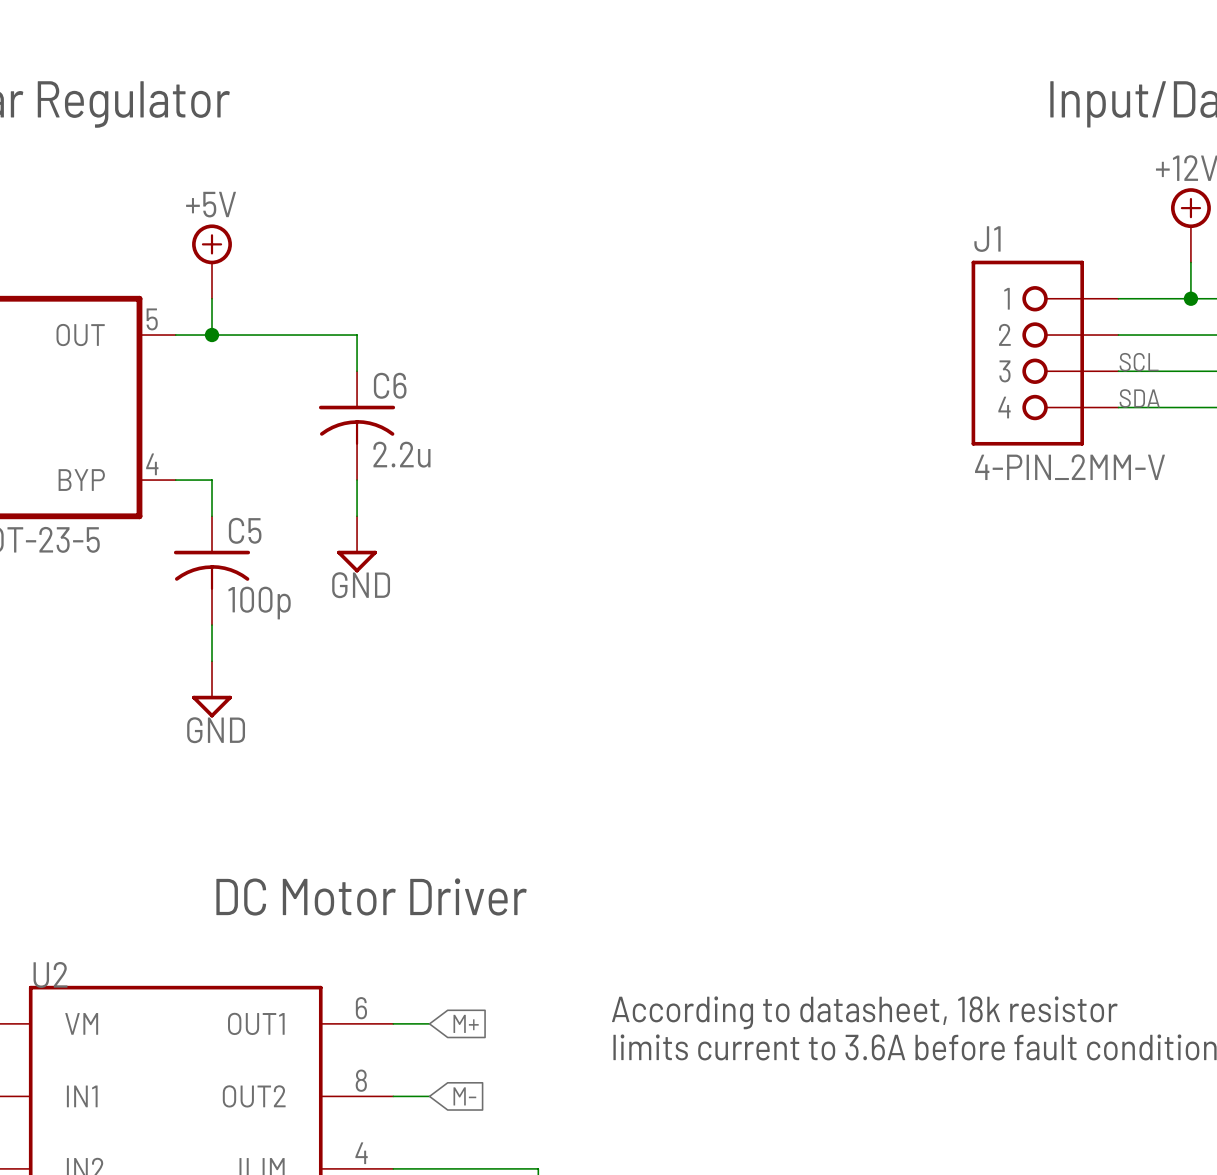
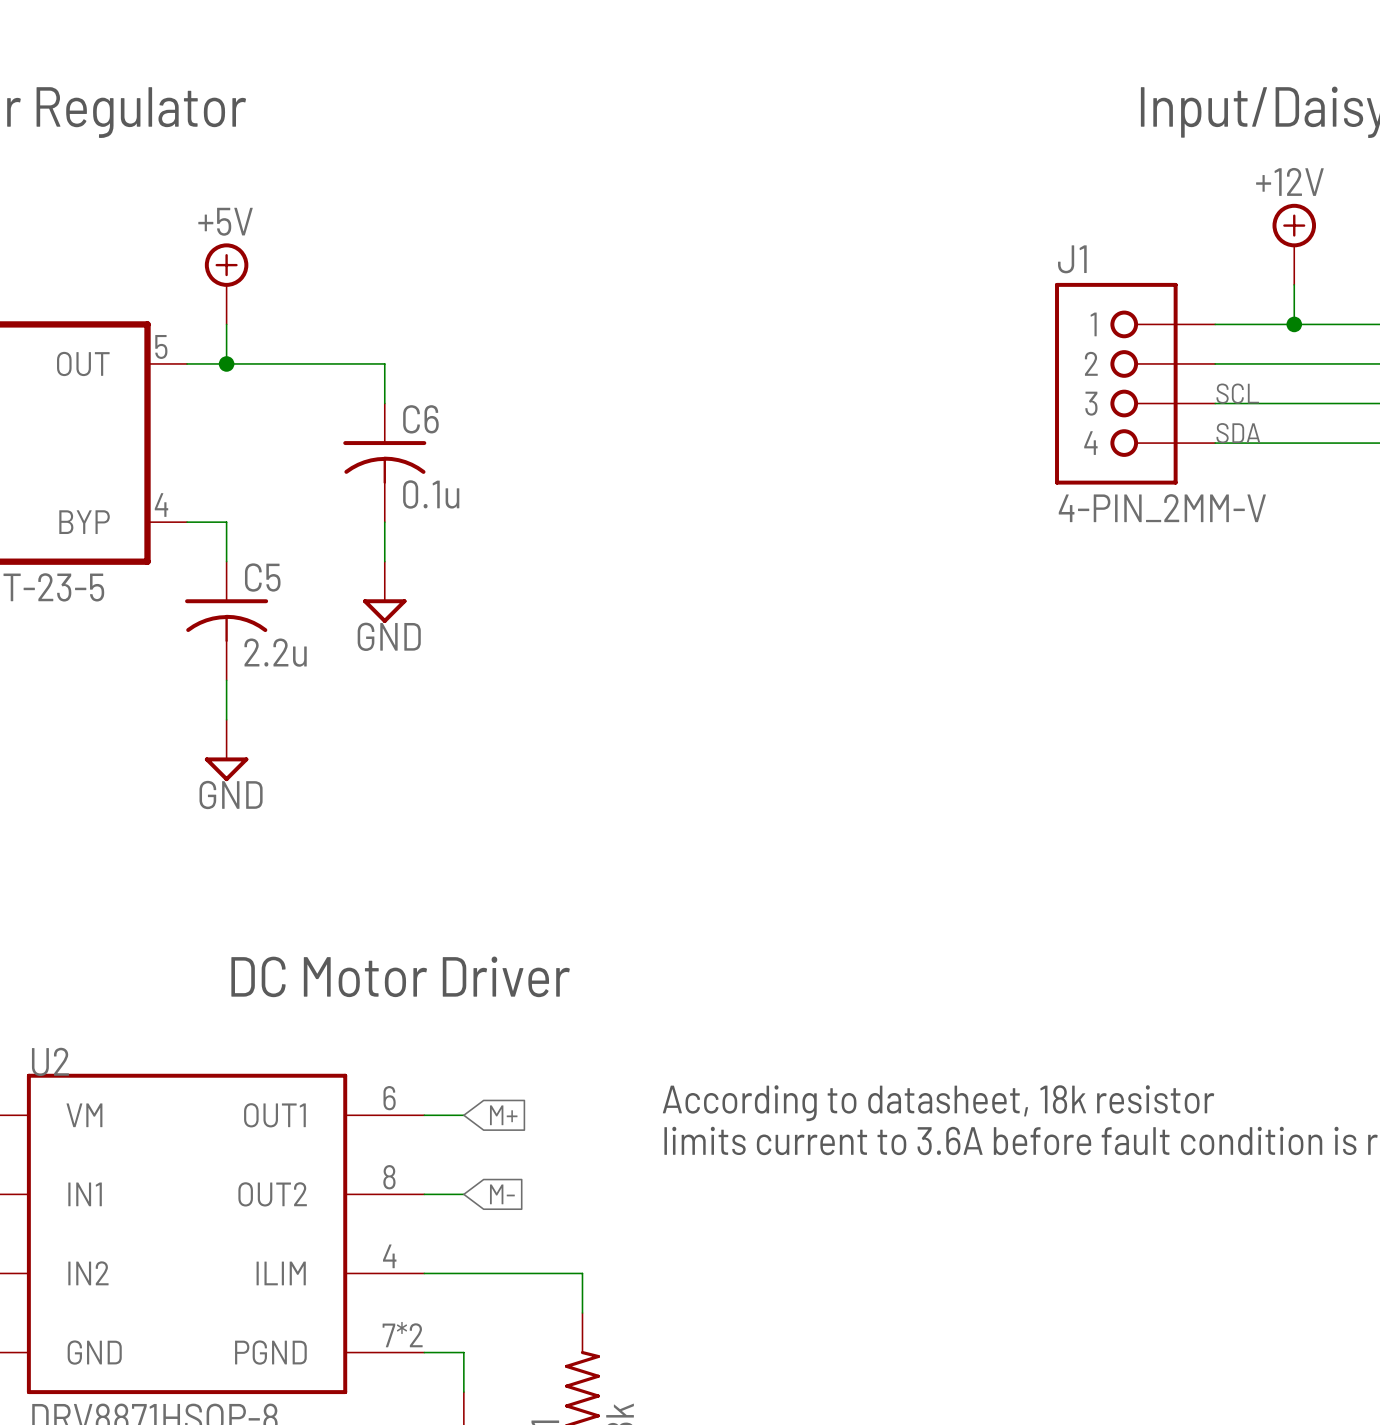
C6 value: 2.2u (401, 454) -> 0.1u (431, 494)
C5 value: 100p (259, 603) -> 2.2u (275, 652)

